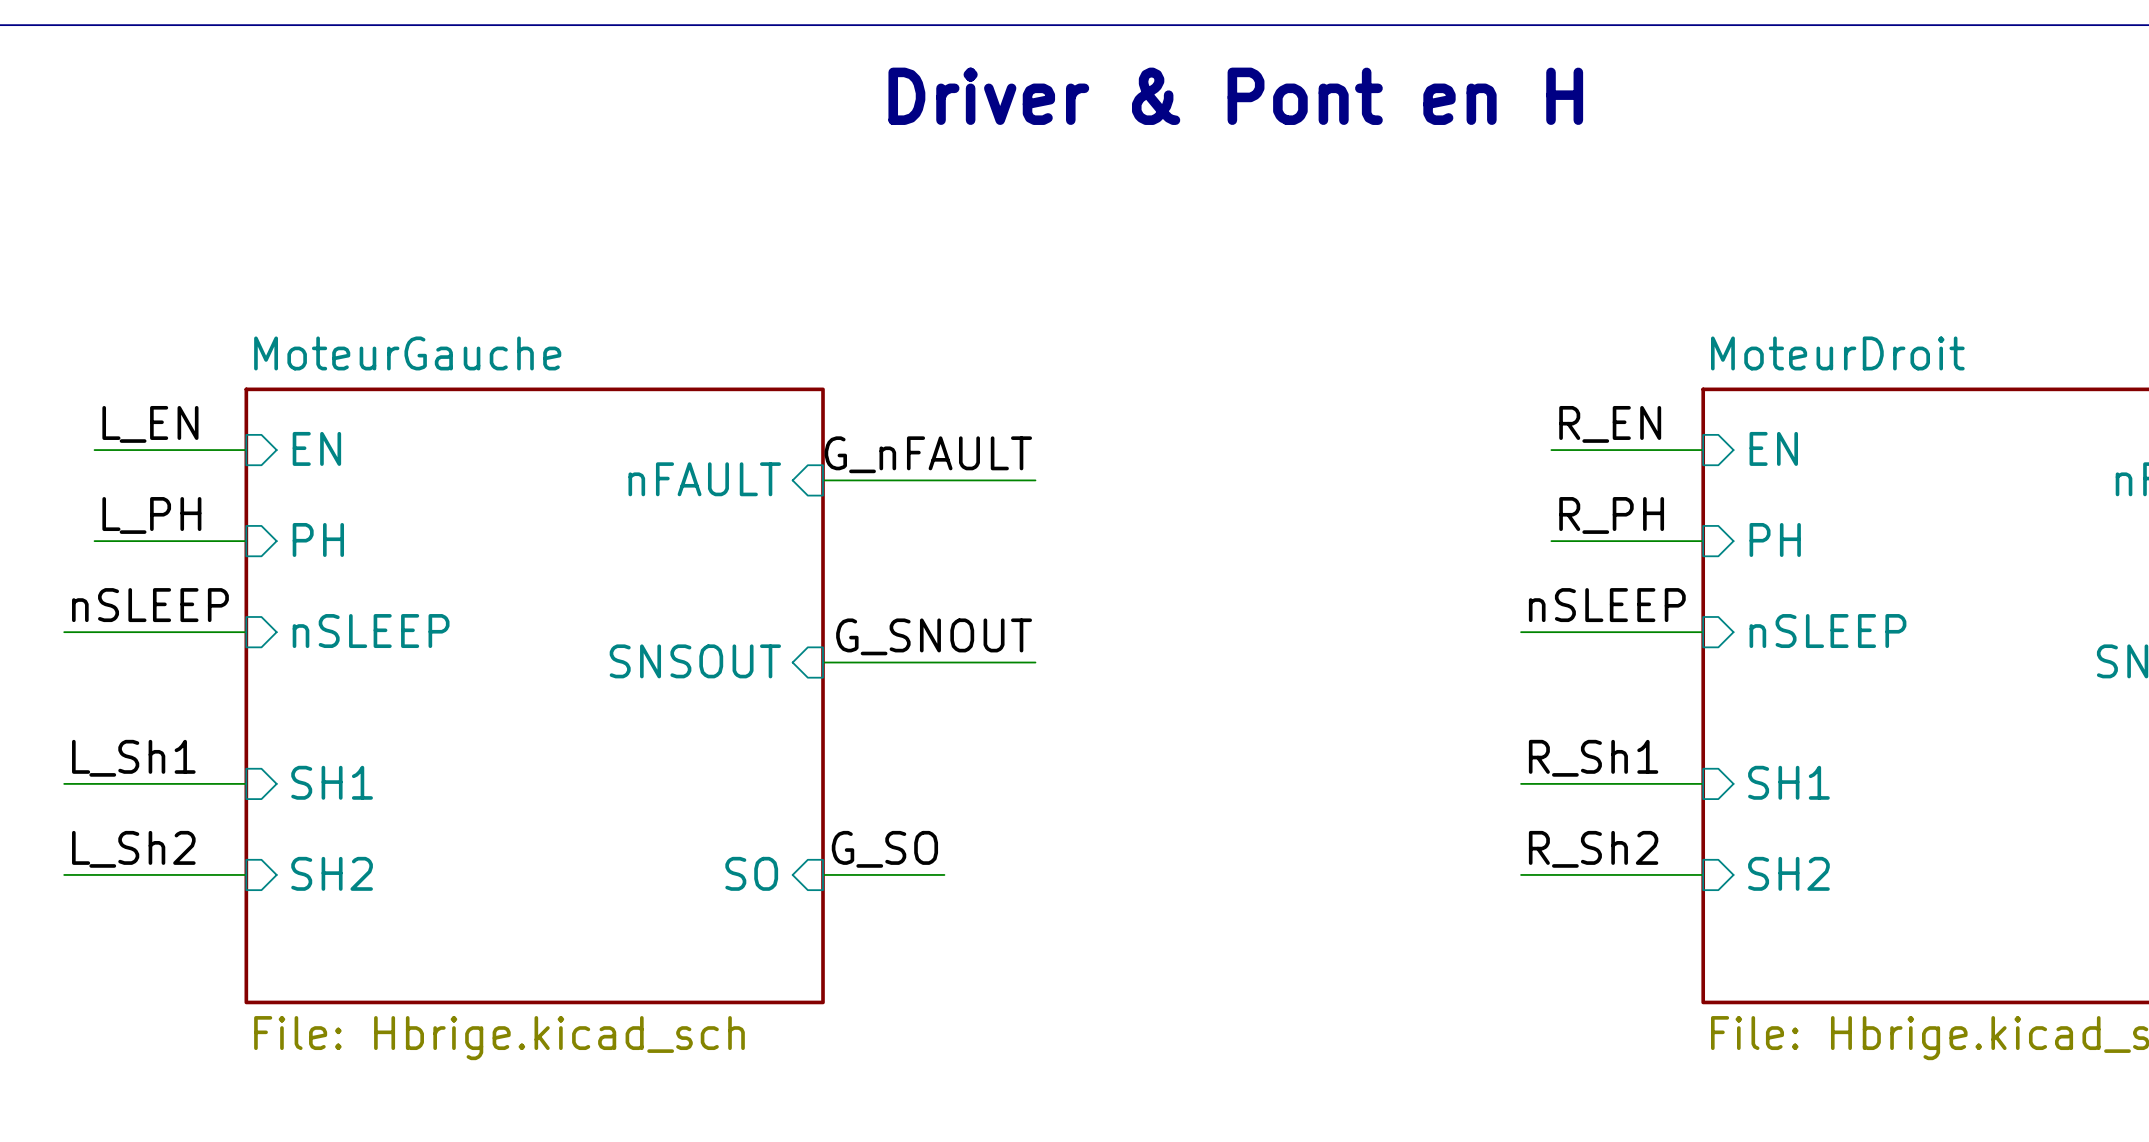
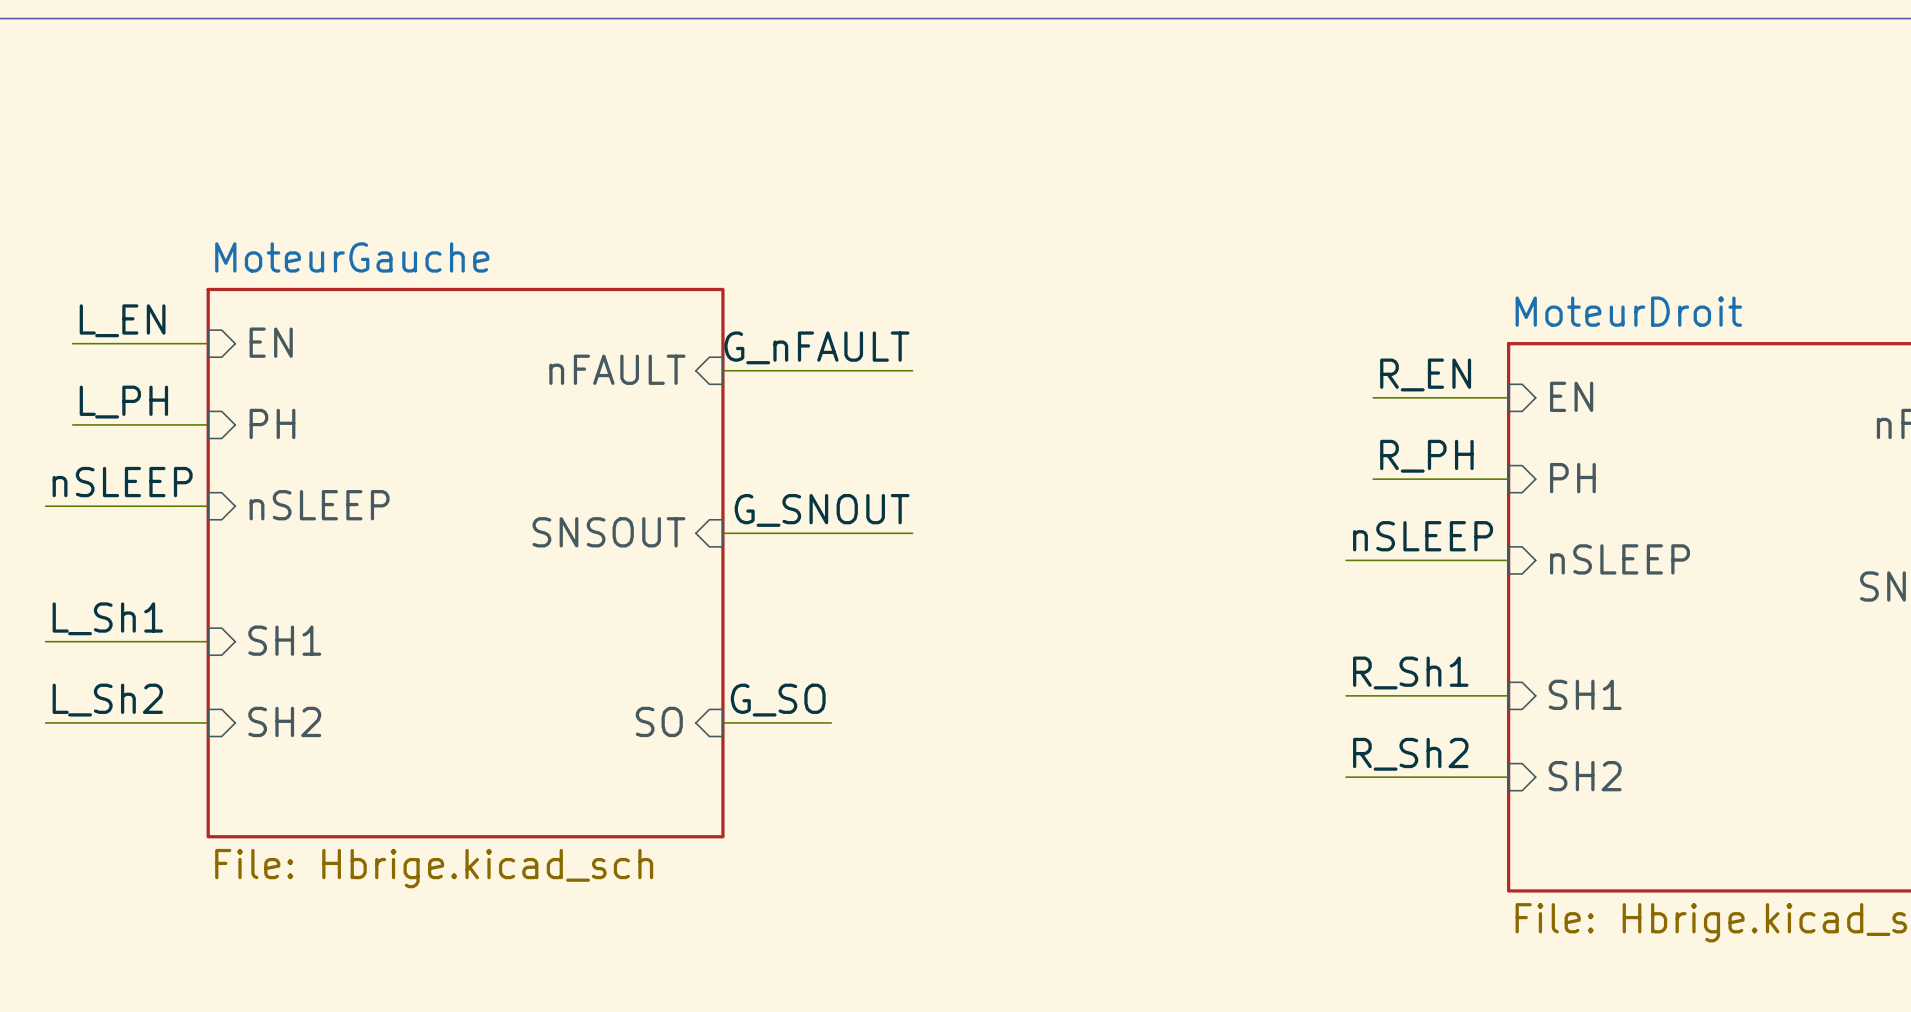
text: Driver & Pont en H (1235, 96) -> none
label position: L_EN (150, 424) -> L_EN (122, 320)
sheet pin position: EN (316, 448) -> EN (271, 342)
wire: (94, 450) (246, 450) -> (72, 343) (208, 343)
label position: G_nFAULT (928, 454) -> G_nFAULT (816, 347)
sheet pin position: nFAULT (704, 479) -> nFAULT (617, 369)
wire: (823, 480) (1035, 480) -> (722, 370) (912, 370)
label position: L_PH (151, 515) -> L_PH (123, 402)
sheet pin position: PH (318, 539) -> PH (272, 423)
wire: (94, 541) (246, 541) -> (72, 424) (208, 424)
label position: nSLEEP (150, 605) -> nSLEEP (122, 482)
sheet pin position: nSLEEP (371, 631) -> nSLEEP (319, 505)
wire: (64, 632) (246, 632) -> (45, 506) (208, 506)
label position: G_SNOUT (934, 636) -> G_SNOUT (822, 510)
sheet pin position: SNSOUT (695, 661) -> SNSOUT (608, 532)
wire: (823, 662) (1035, 662) -> (722, 533) (912, 533)
sheet MoteurGauche position: (534, 695) -> (465, 563)
label position: L_Sh1 (133, 758) -> L_Sh1 (107, 618)
sheet pin position: SH1 (332, 782) -> SH1 (284, 640)
wire: (64, 783) (246, 783) -> (45, 641) (208, 641)
label position: L_Sh2 (133, 849) -> L_Sh2 (107, 700)
label position: G_SO (884, 849) -> G_SO (778, 700)
sheet pin position: SH2 (332, 873) -> SH2 (284, 721)
sheet pin position: SO (751, 873) -> SO (659, 721)
wire: (64, 874) (246, 874) -> (45, 722) (208, 722)
wire: (823, 874) (944, 874) -> (722, 722) (831, 722)

